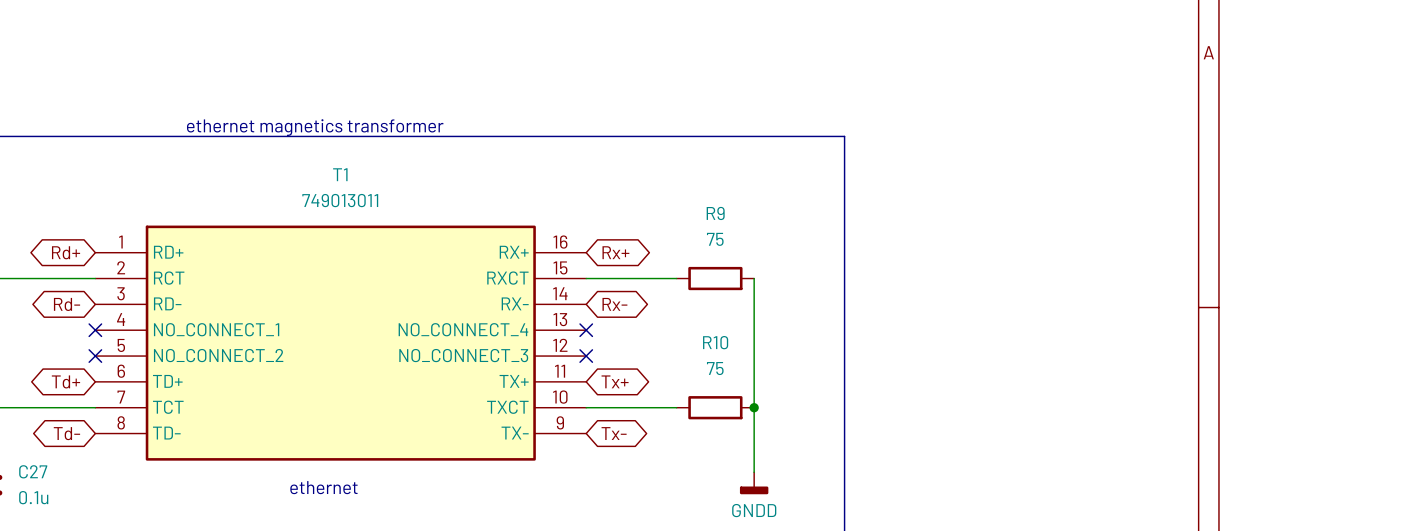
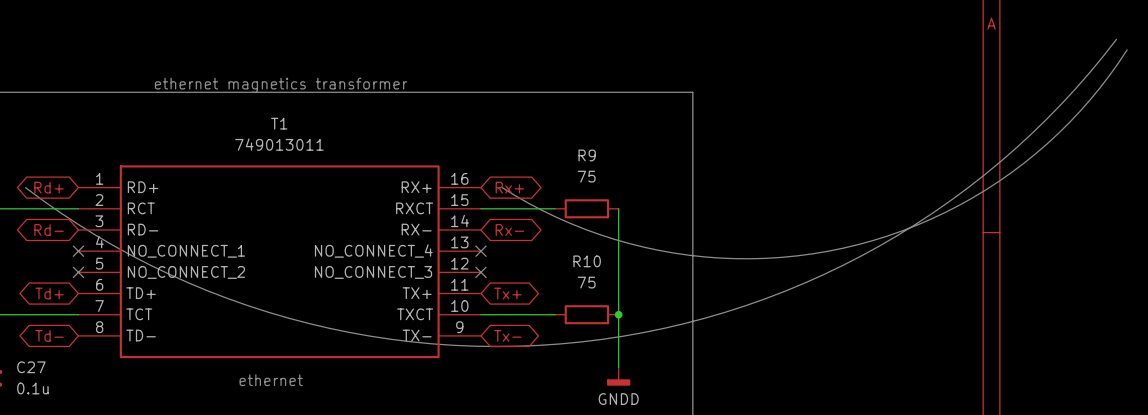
line: none -> (1116, 39) (1061, 103) (1016, 147) (967, 187) (898, 235) (842, 265) (765, 298) (684, 323) (601, 339) (517, 346) (433, 343) (370, 336) (288, 318) (228, 298) (150, 265) (77, 223) (25, 187)
line: none -> (1127, 49) (1100, 87) (1069, 122) (1035, 153) (1011, 172) (972, 198) (931, 219) (887, 235) (843, 248) (797, 255) (751, 258) (704, 256) (659, 250) (614, 239) (570, 223) (528, 203) (502, 187)

